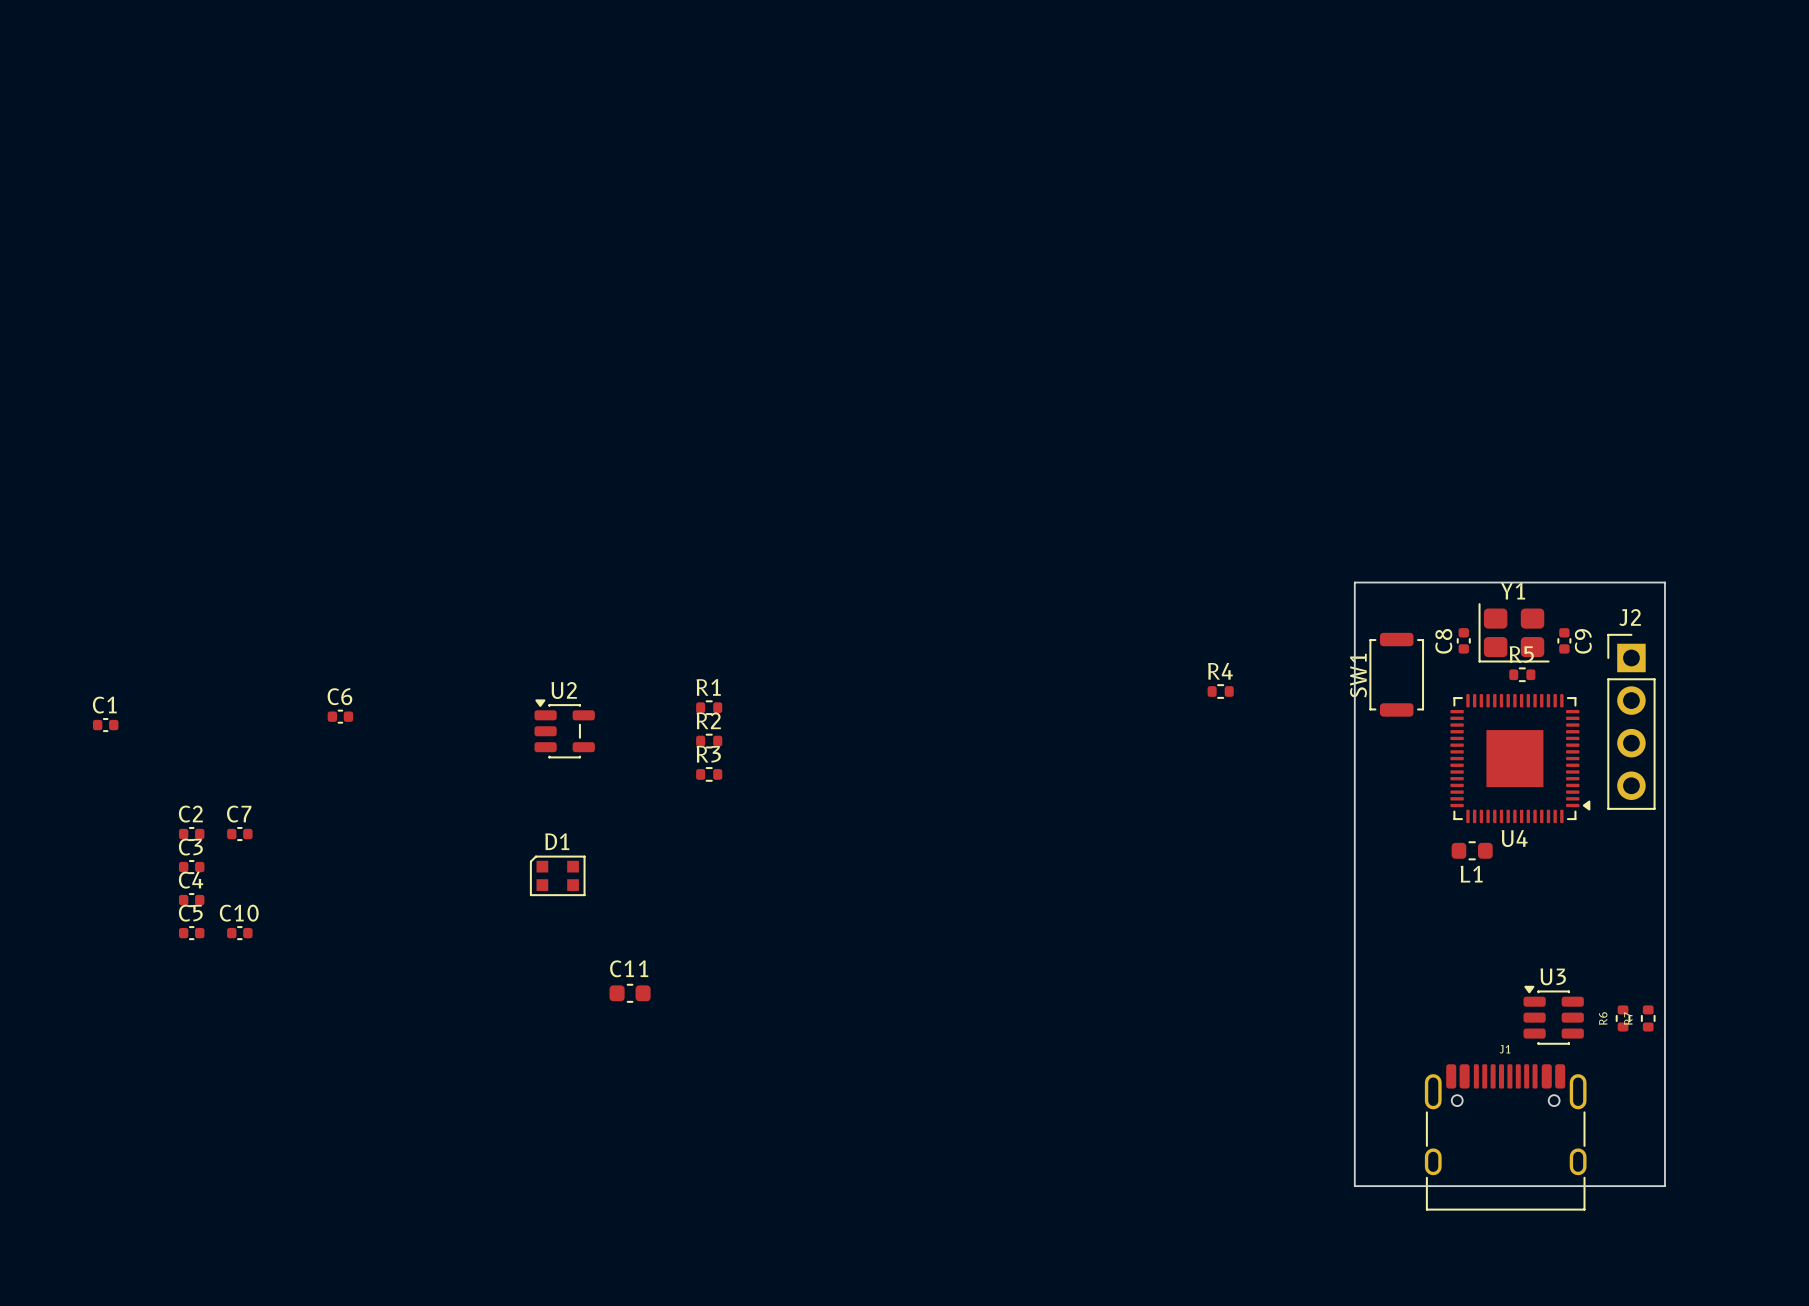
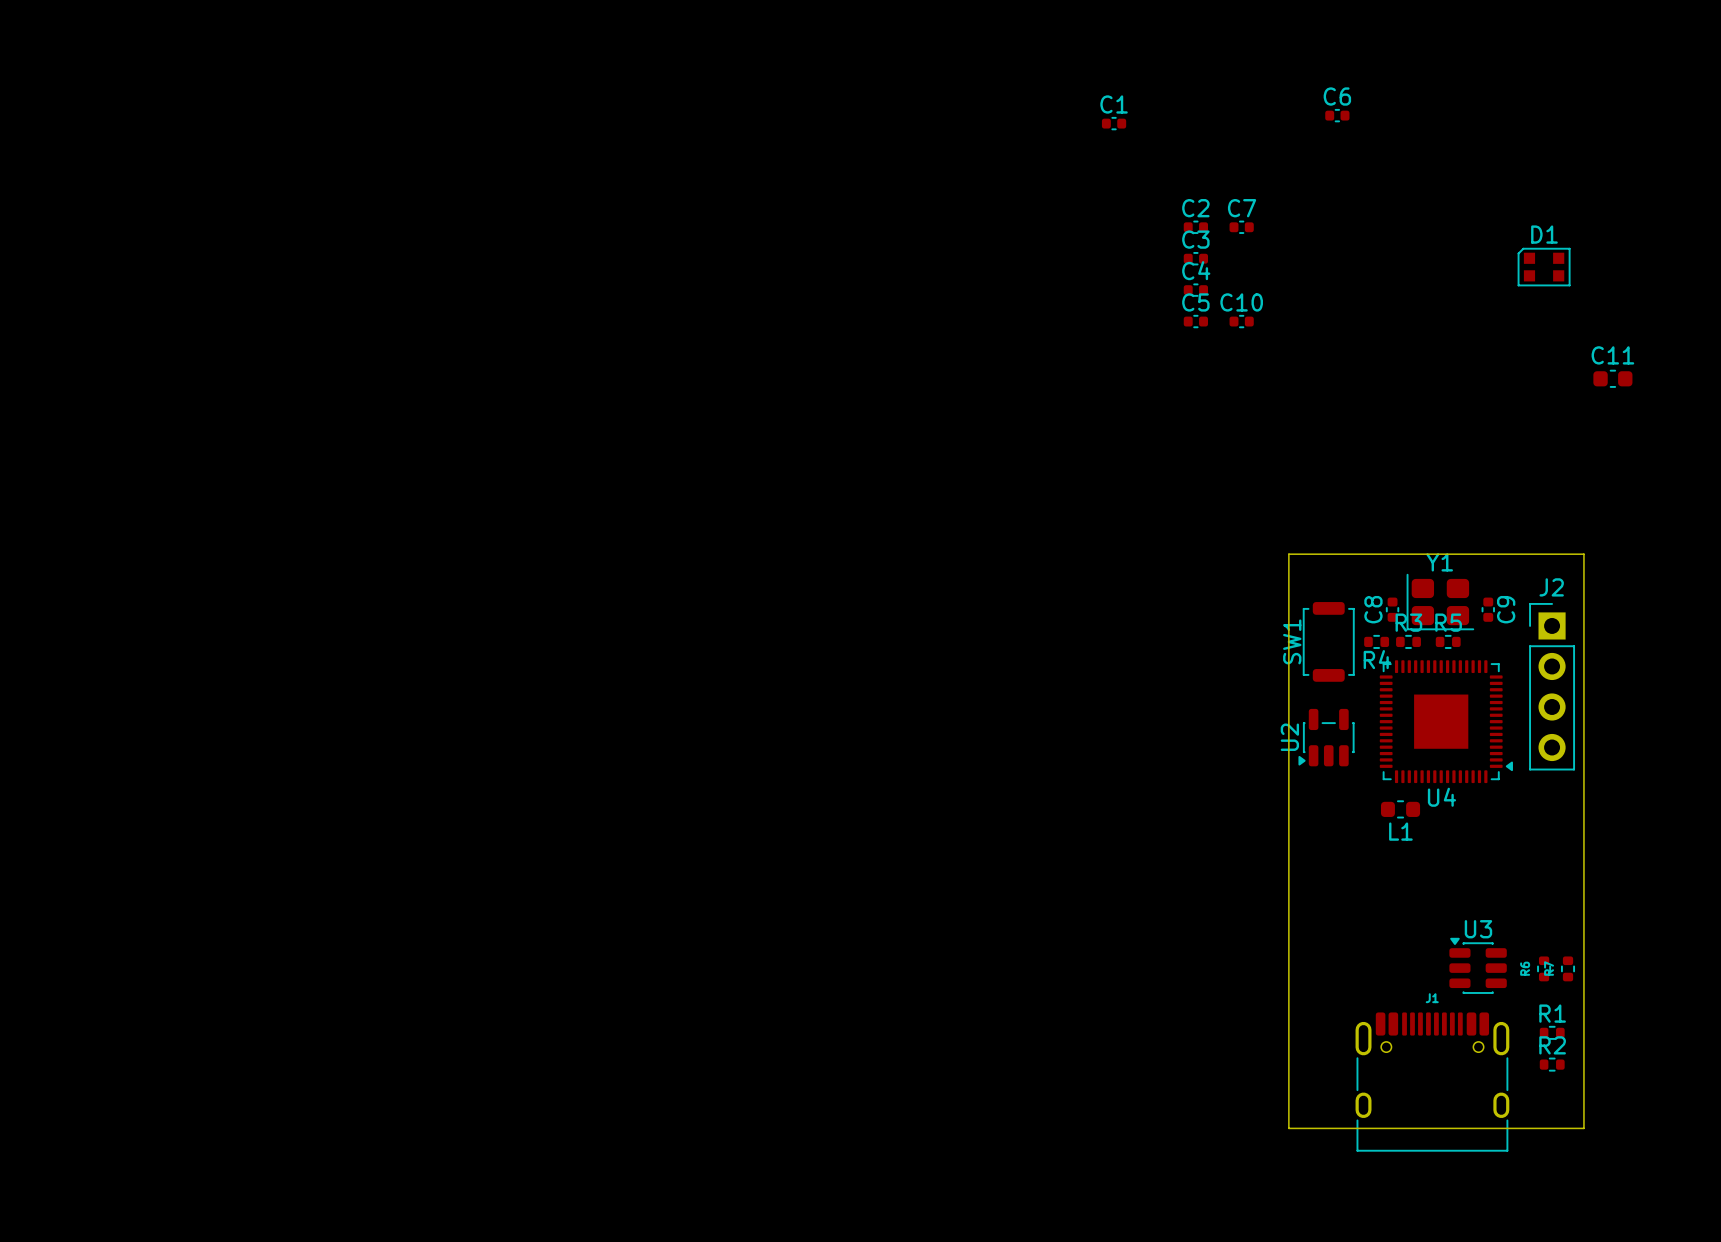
R4 name position: R4 (1220, 671) -> R4 (1377, 659)
R4 position: (1220, 691) -> (1376, 641)
R1 position: (709, 707) -> (1552, 1032)
C6 position: (340, 716) -> (1337, 115)
C1 position: (105, 725) -> (1114, 123)
U2 rotation: 0° (564, 728) -> 90° counterclockwise (1326, 737)
U2 position: (564, 728) -> (1326, 737)
R2 position: (709, 741) -> (1552, 1064)
R3 position: (709, 774) -> (1408, 641)
C2 position: (191, 834) -> (1195, 227)
C7 position: (239, 834) -> (1241, 227)
C3 position: (191, 867) -> (1195, 258)
D1 position: (557, 875) -> (1544, 267)
C4 position: (191, 900) -> (1195, 290)
C5 position: (191, 933) -> (1195, 321)
C10 position: (239, 933) -> (1241, 321)
C11 position: (630, 993) -> (1612, 378)

